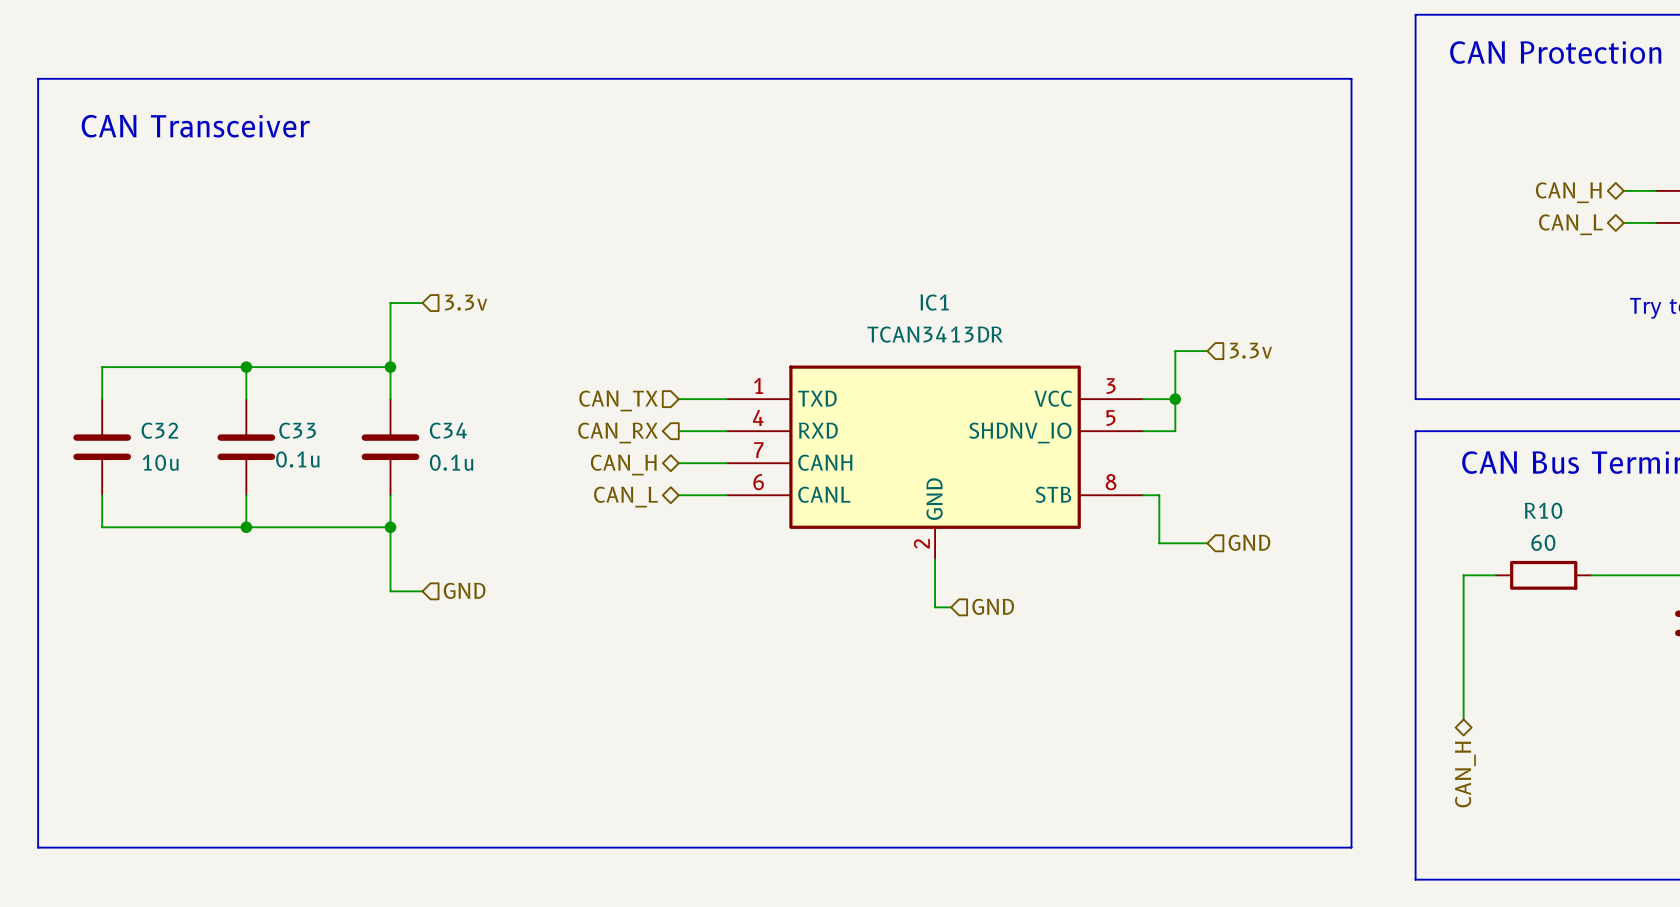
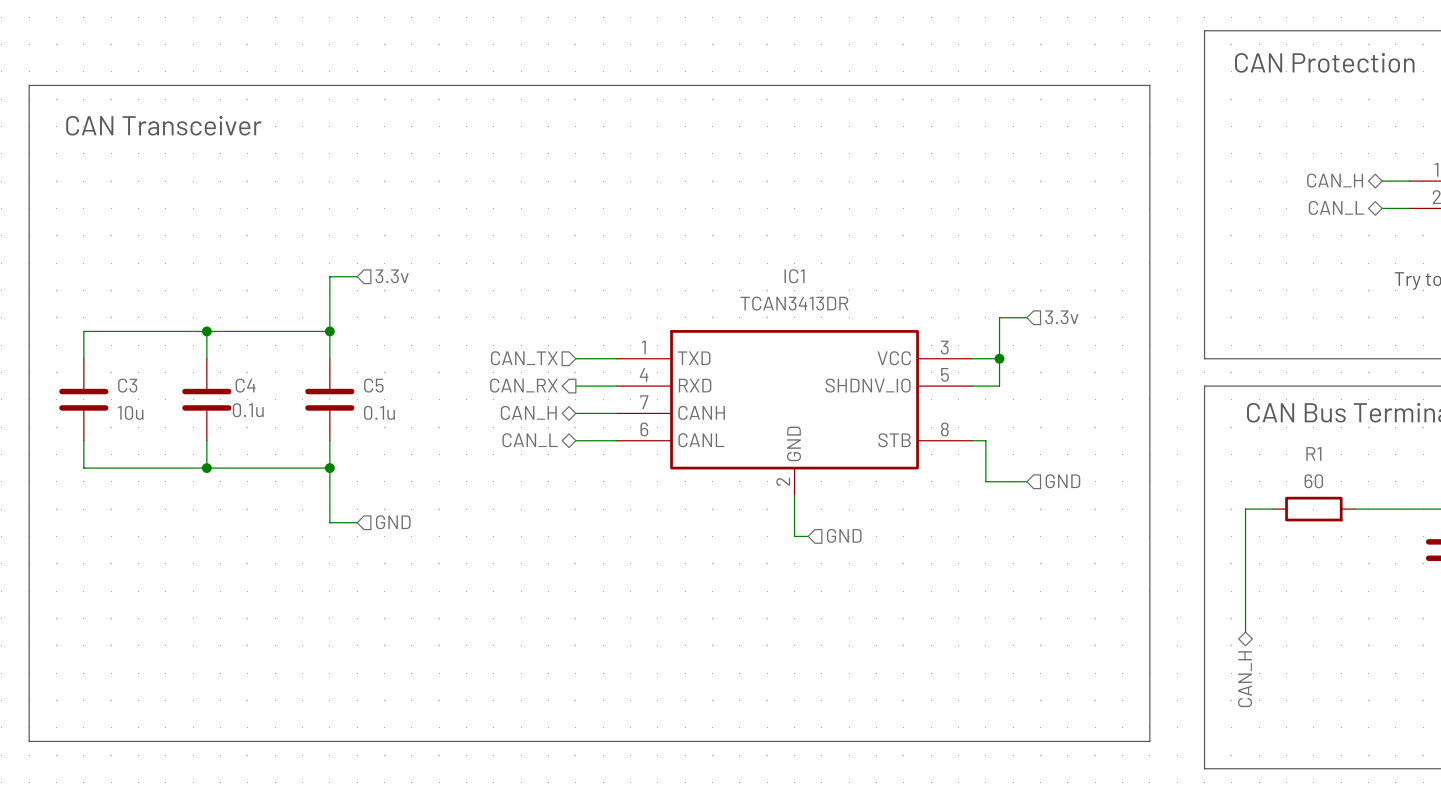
C32 name: C32 (159, 430) -> C3 (127, 385)
C33 name: C33 (297, 430) -> C4 (245, 385)
C34 name: C34 (448, 430) -> C5 (373, 385)
R10 name: R10 (1543, 510) -> R1 (1313, 453)

